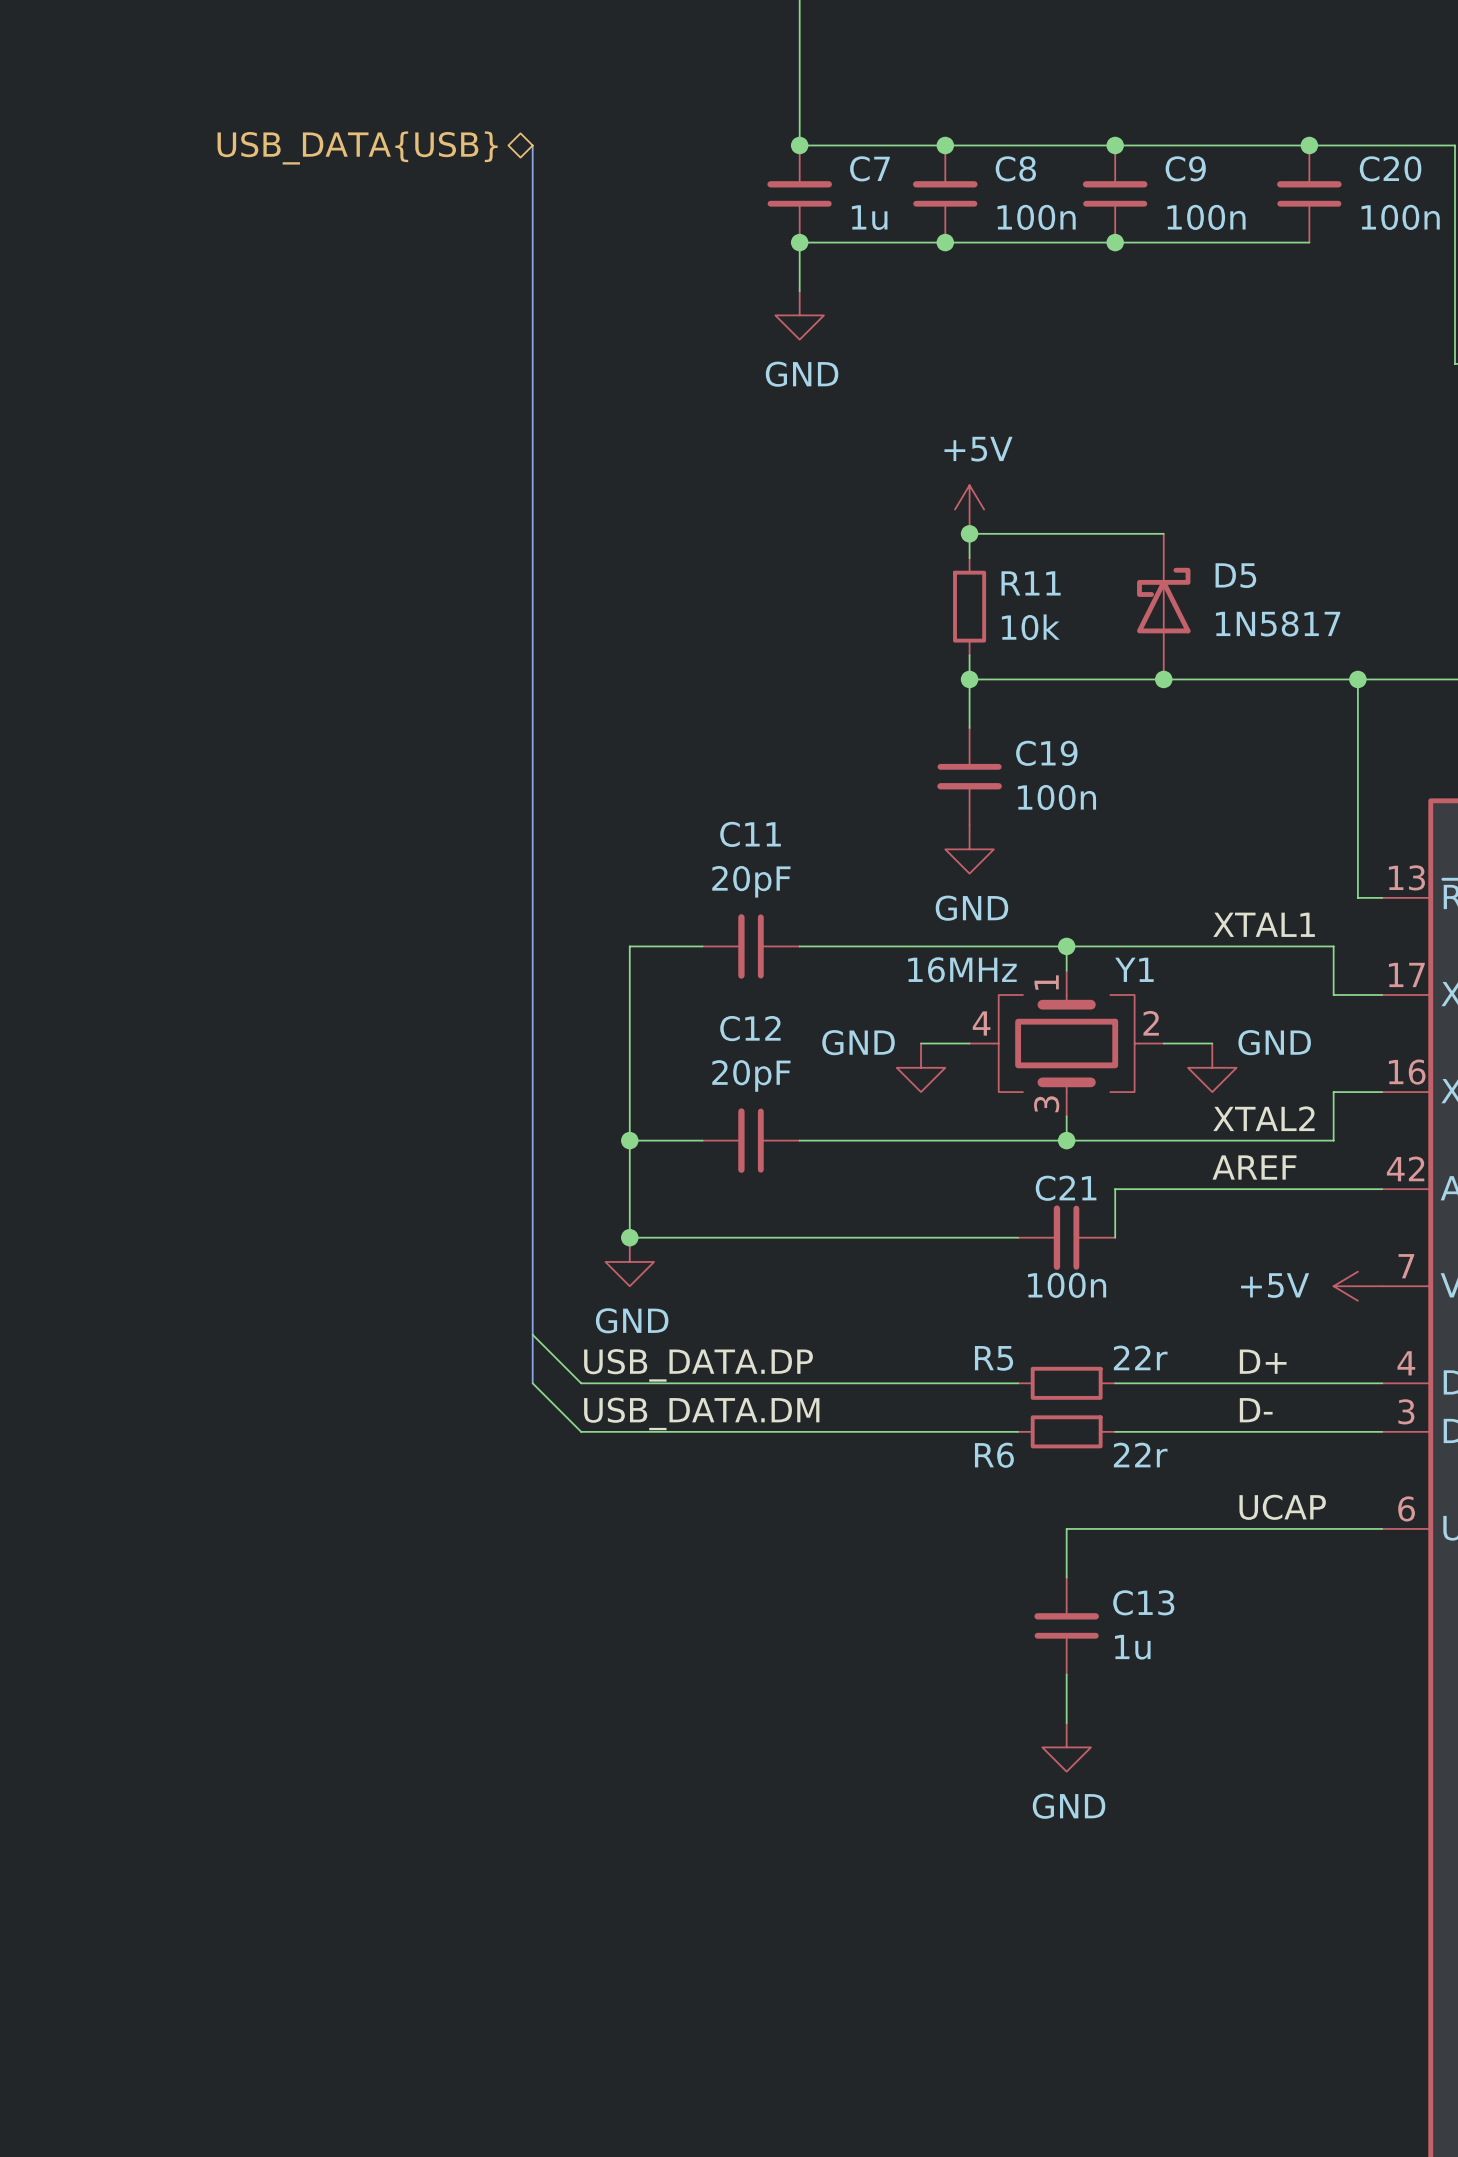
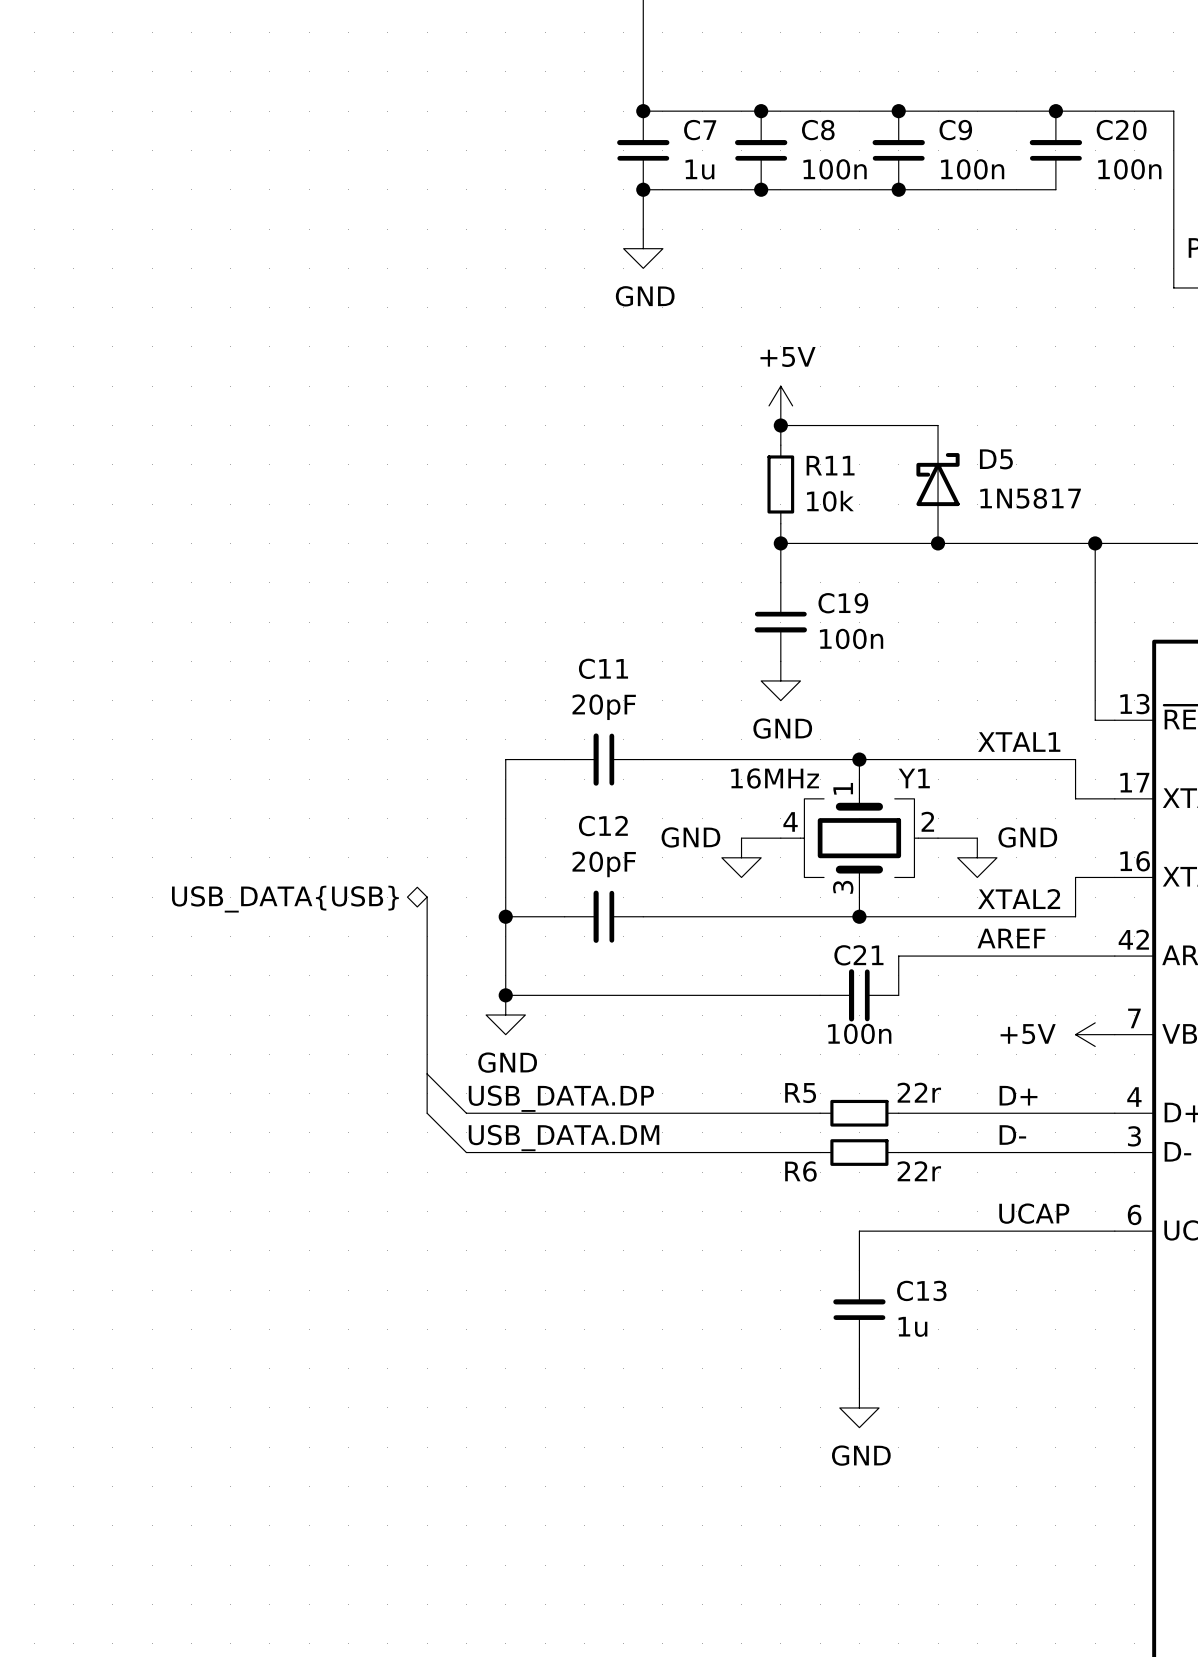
bus: (532, 145) (532, 1116) -> none
hierarchical label: USB_DATA{USB} (357, 147) -> none
hierarchical label: none -> USB_DATA{USB} (285, 899)

